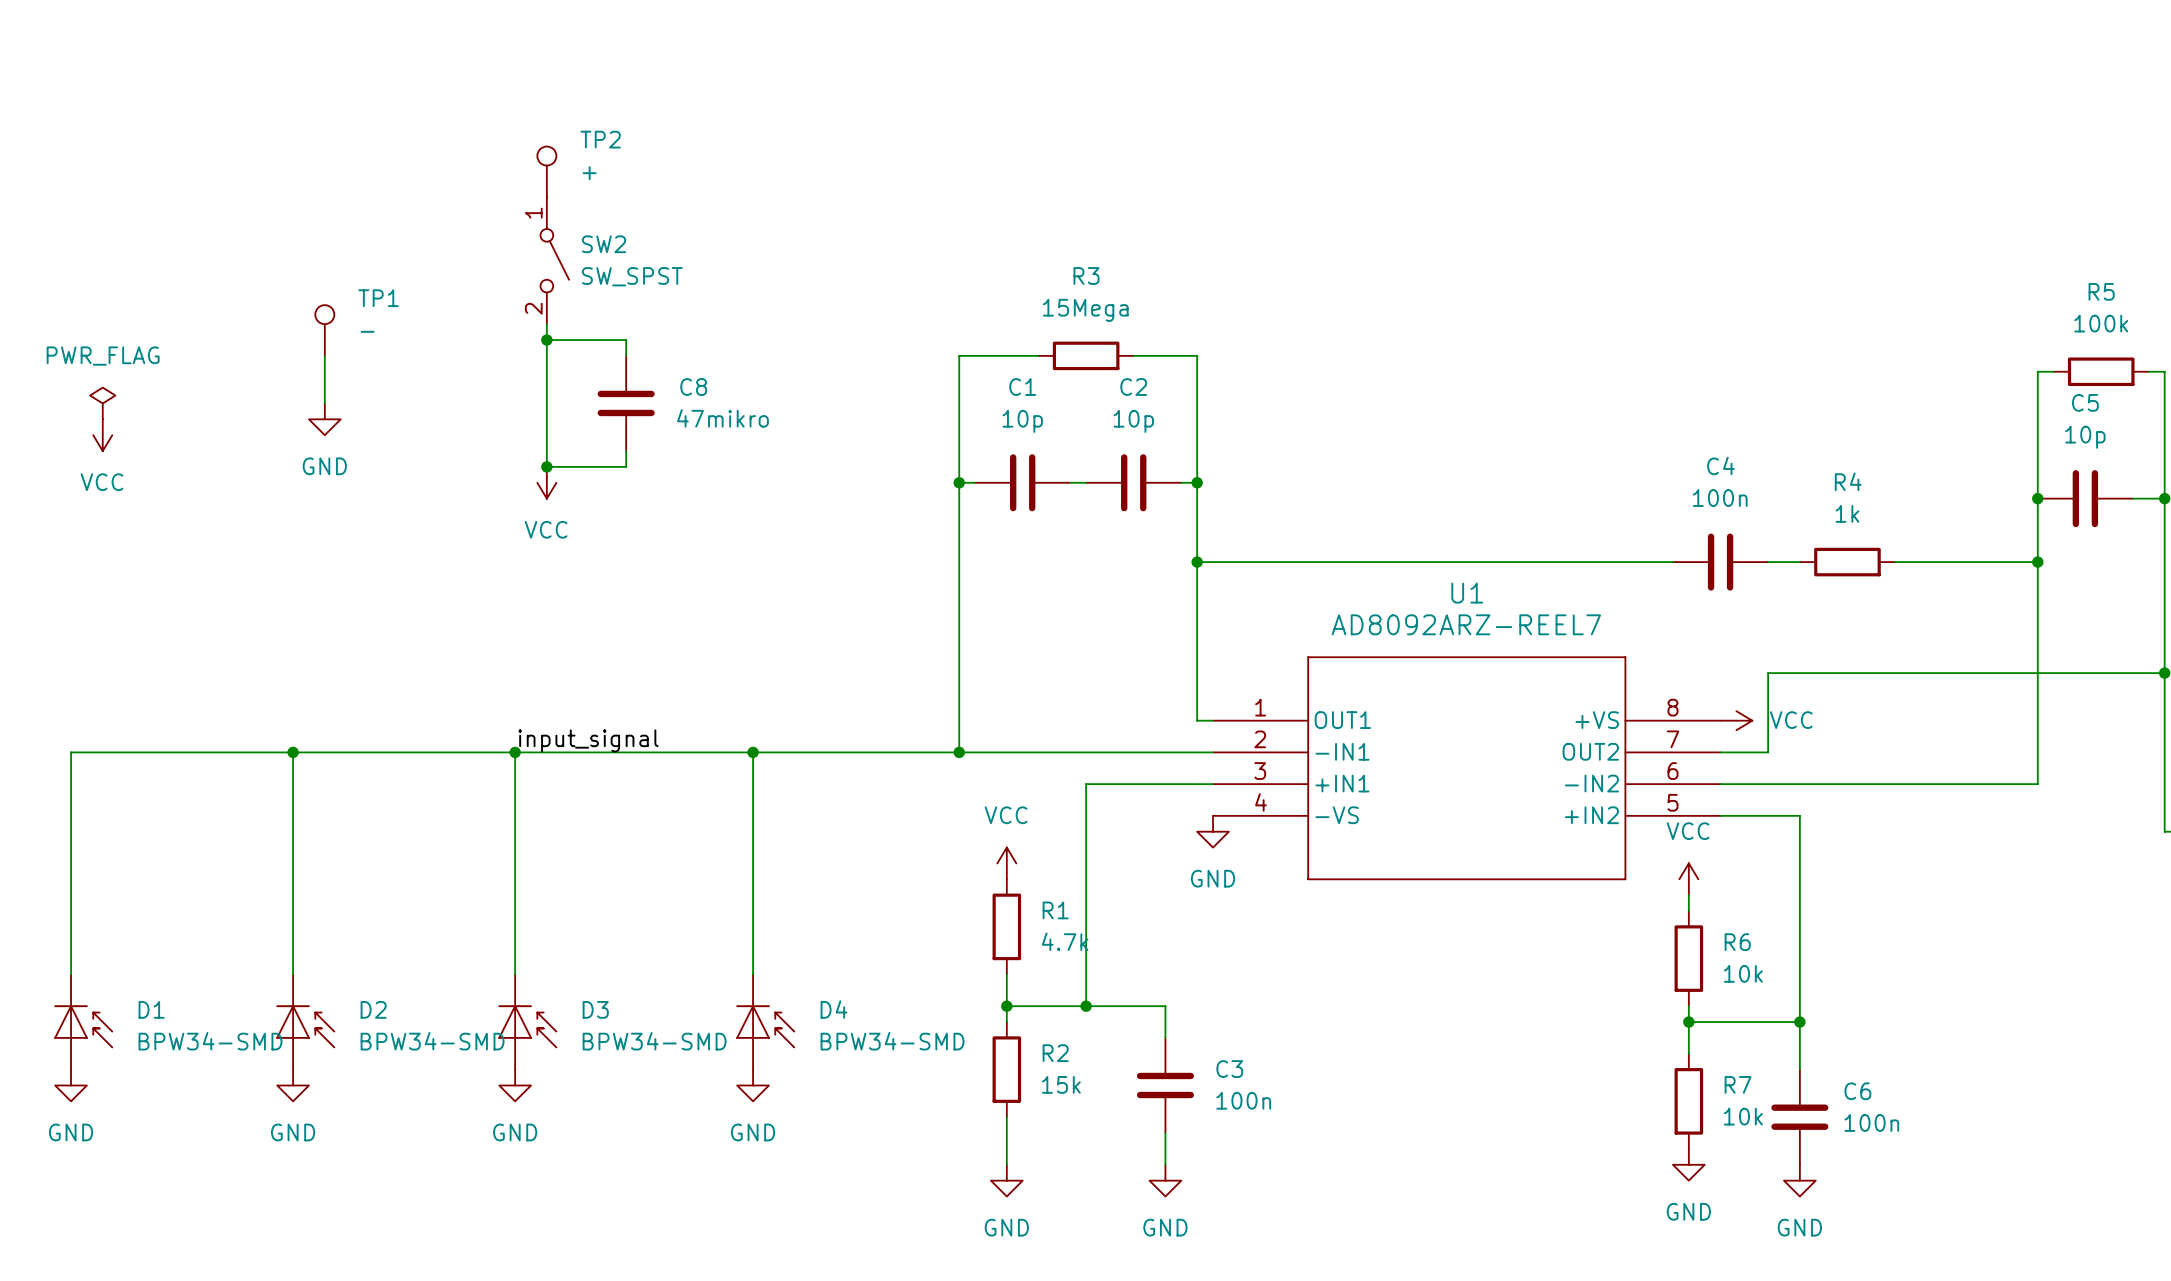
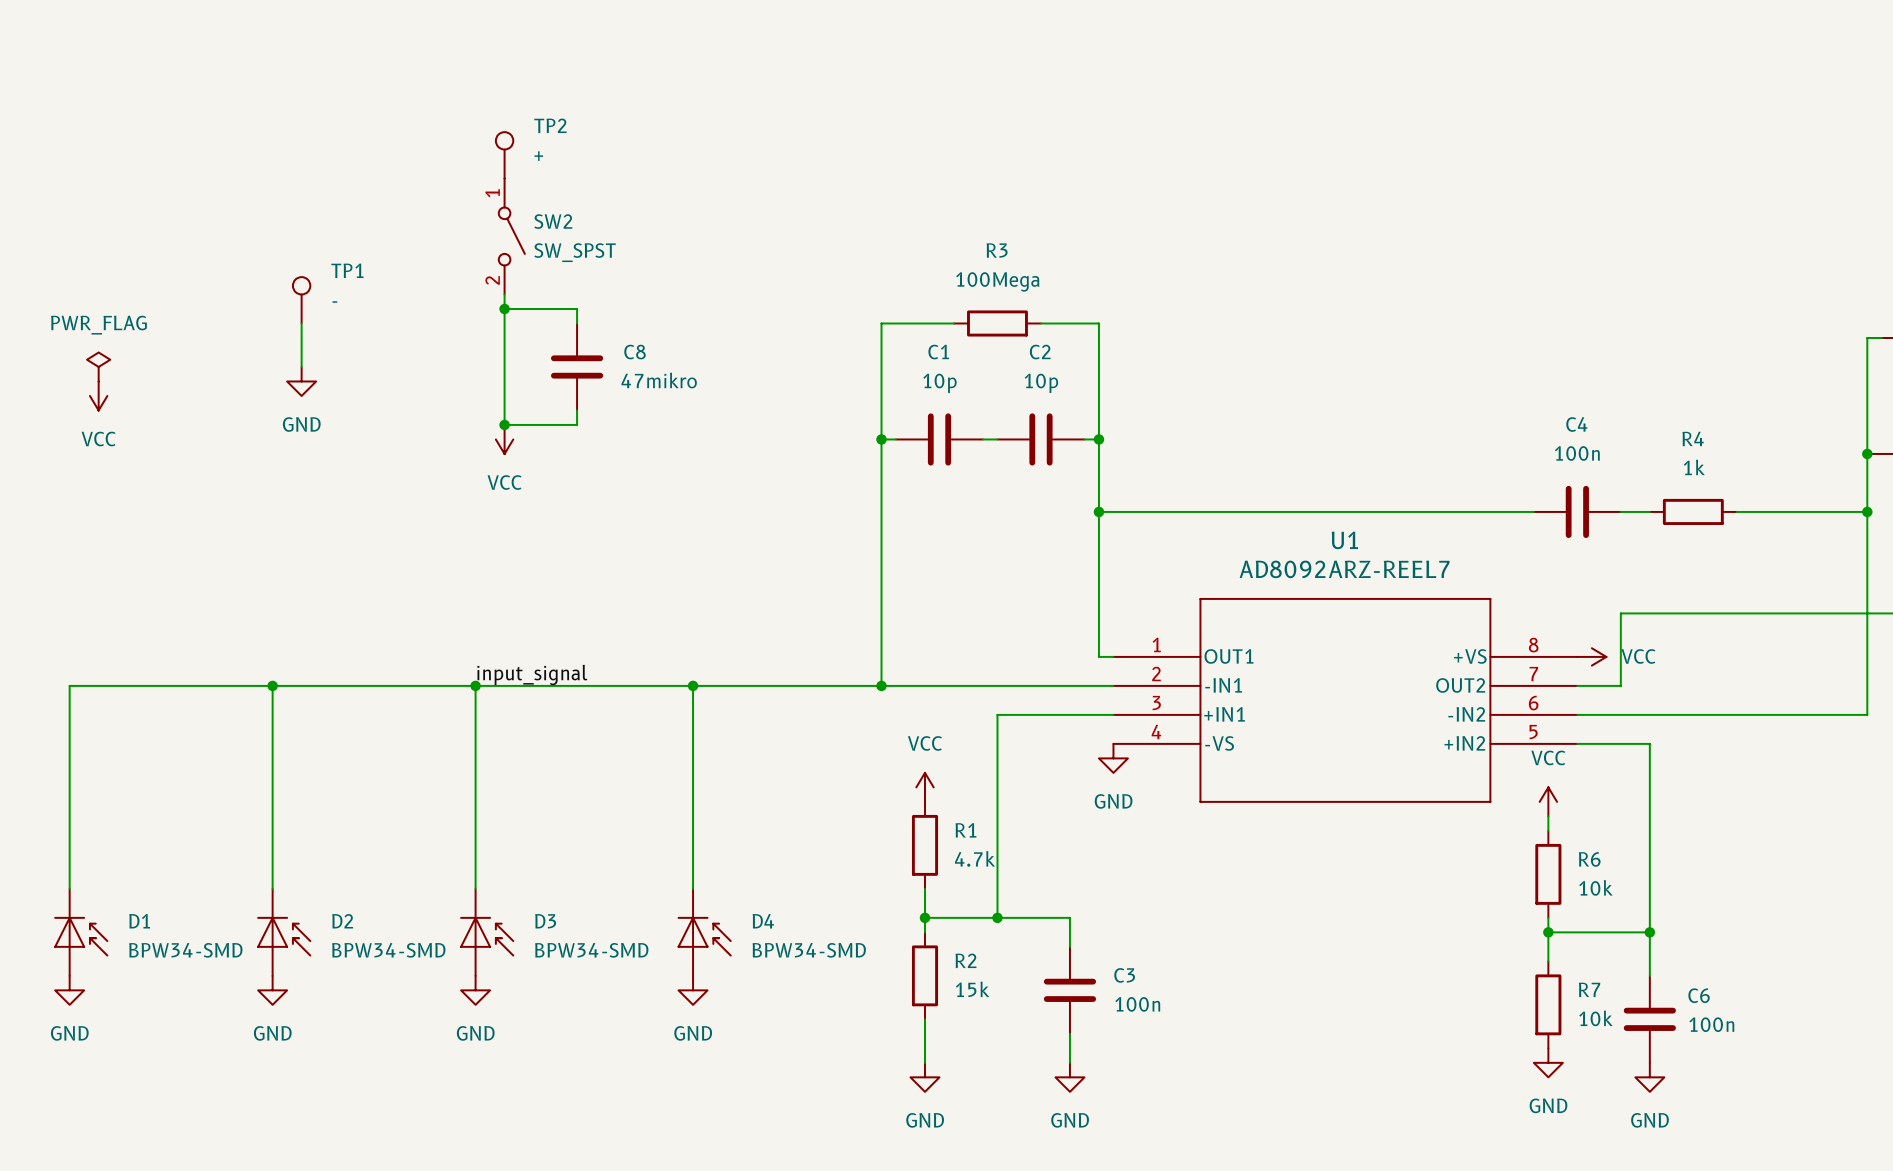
R3 value: 15Mega (1085, 310) -> 100Mega (997, 281)

